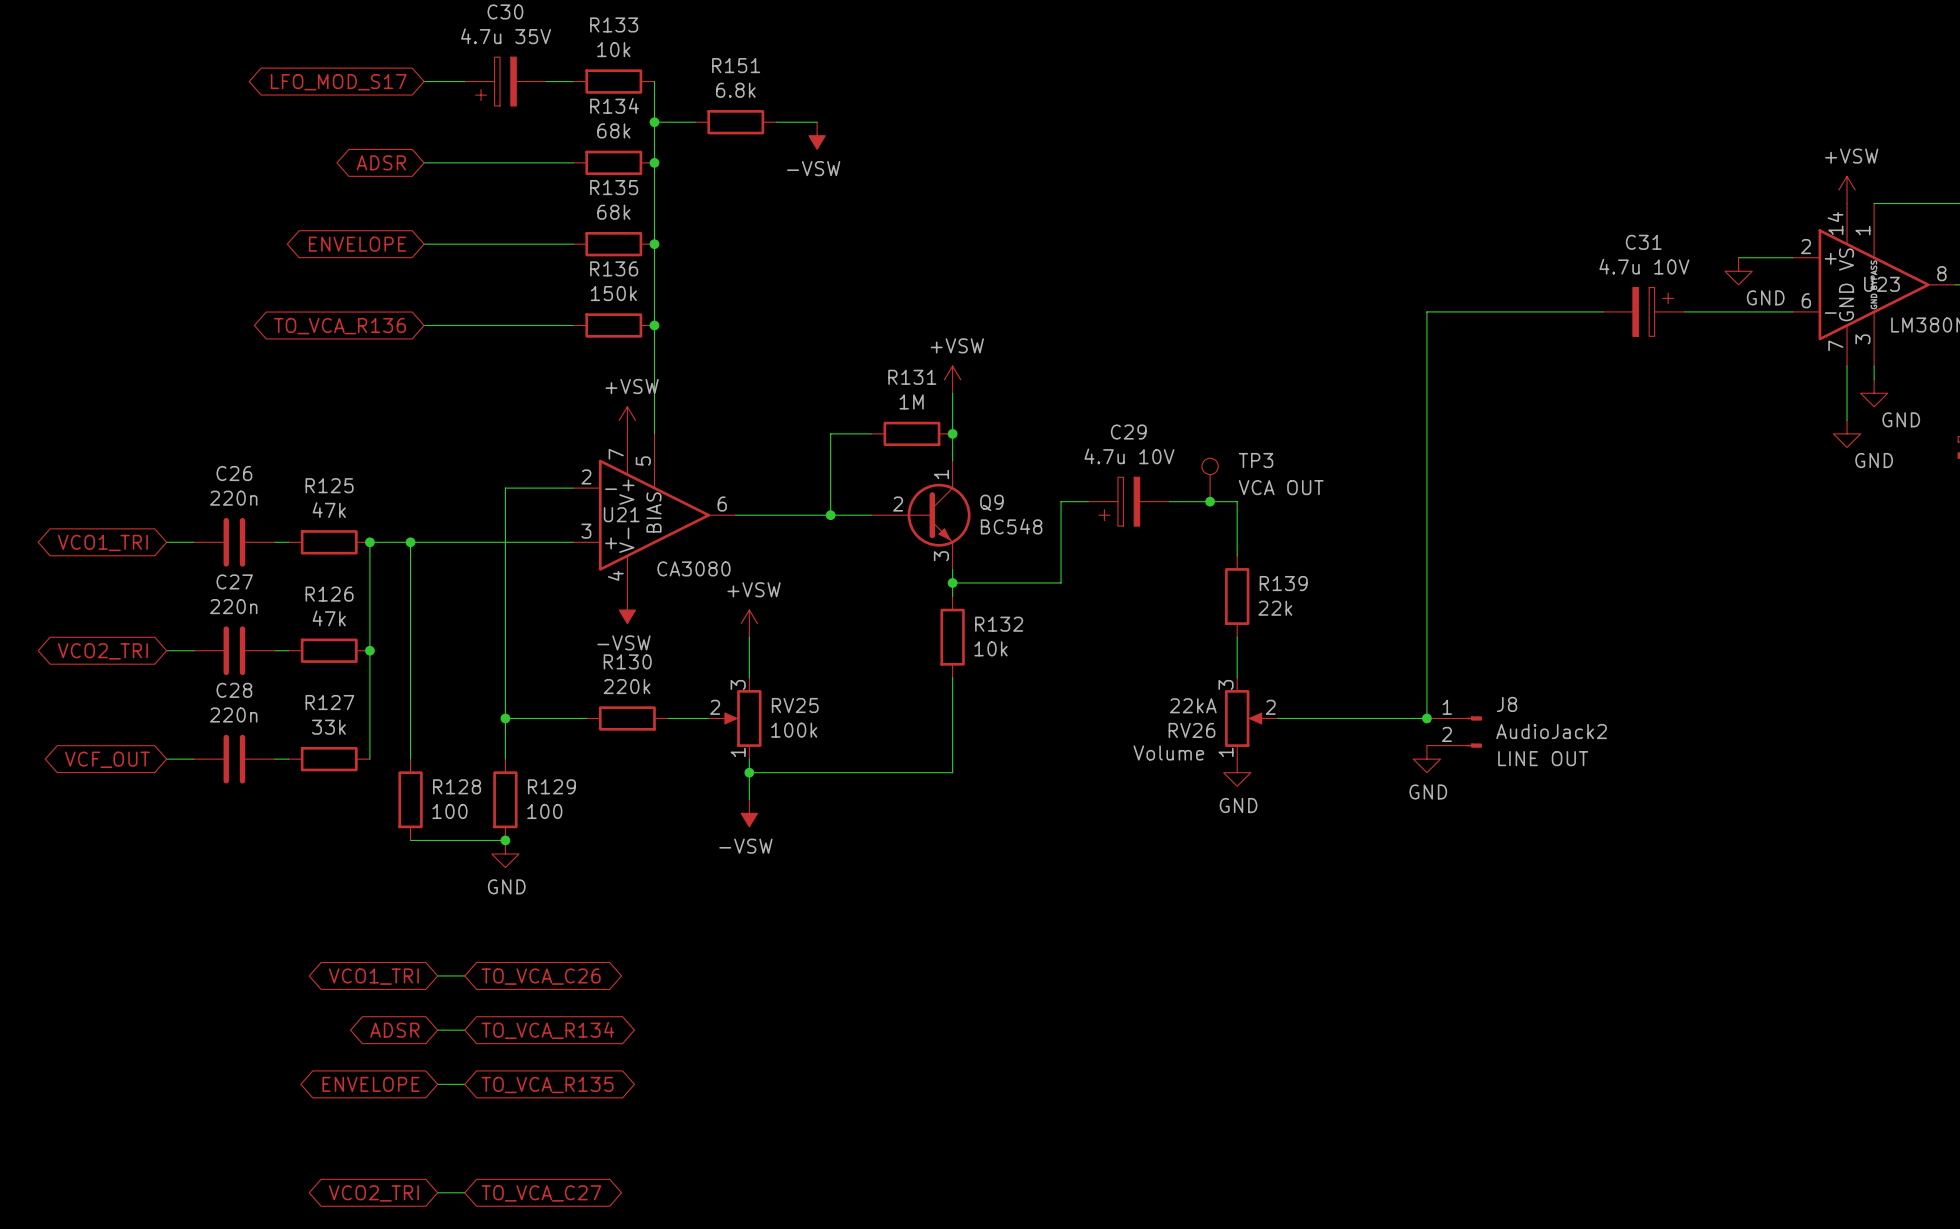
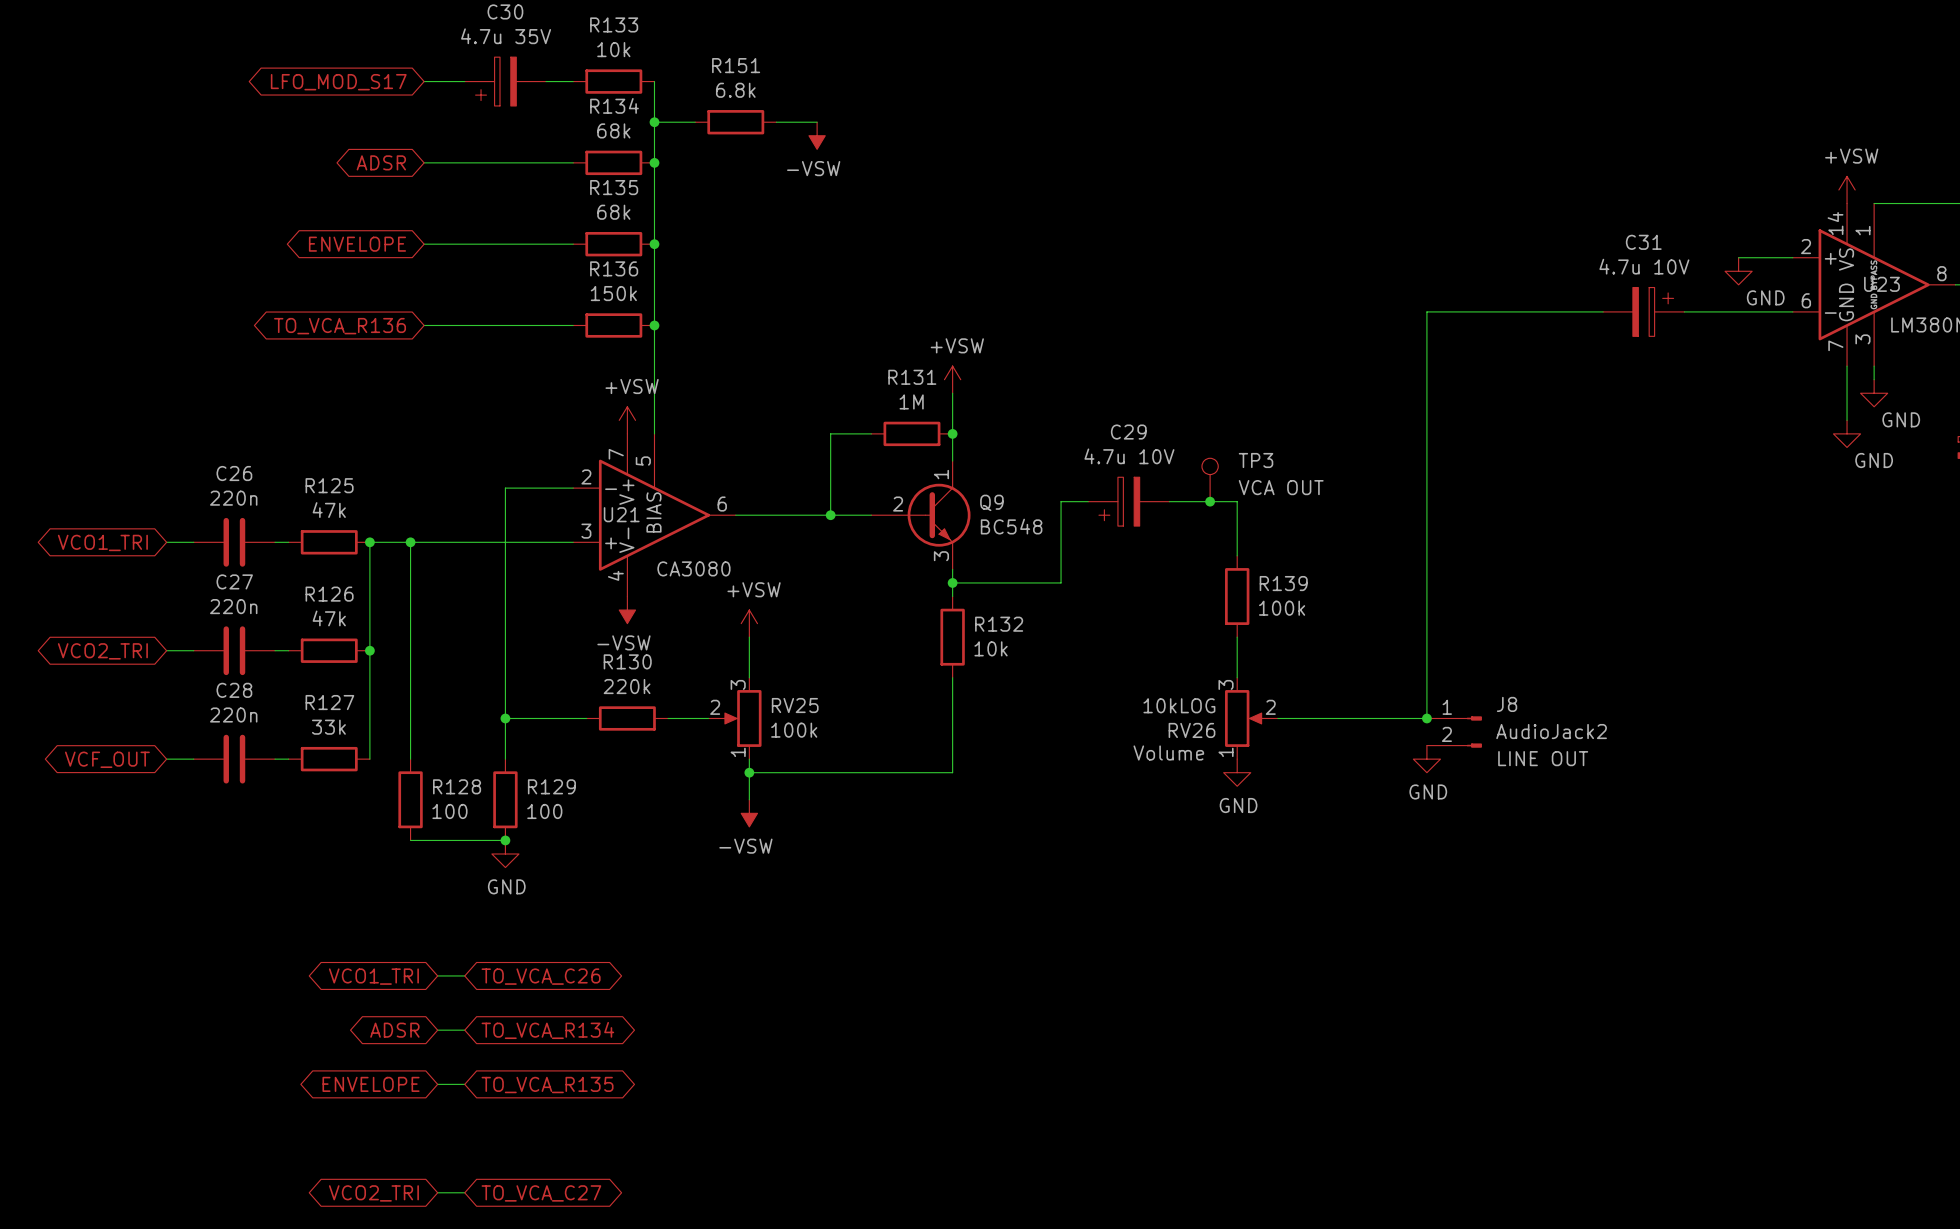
R139 value: 22k (1275, 608) -> 100k (1282, 608)
RV26 value: 22kA (1193, 705) -> 10kLOG (1179, 705)

